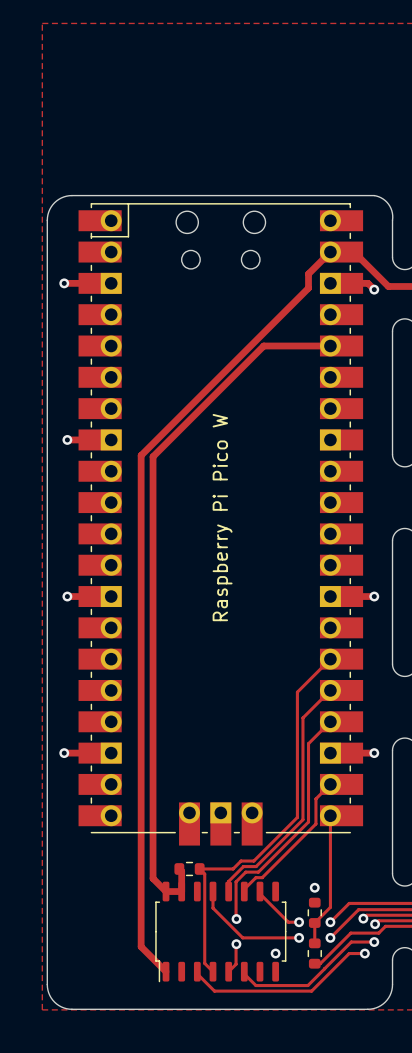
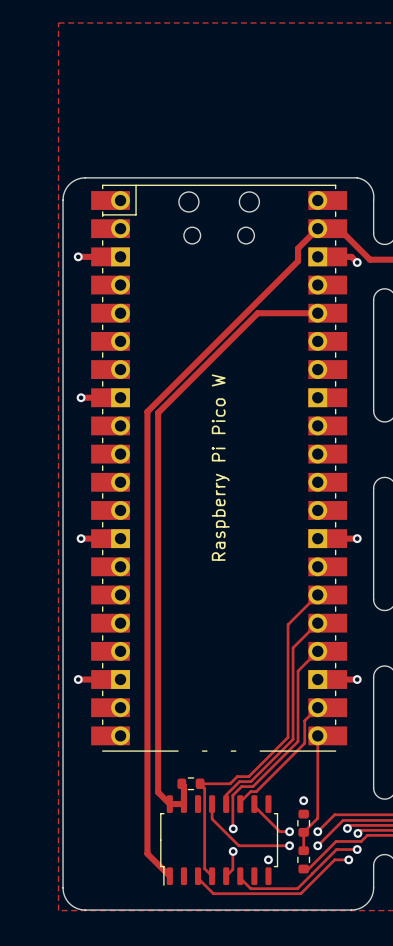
part footprint: [78, 203, 364, 846] -> [91, 184, 348, 752]

